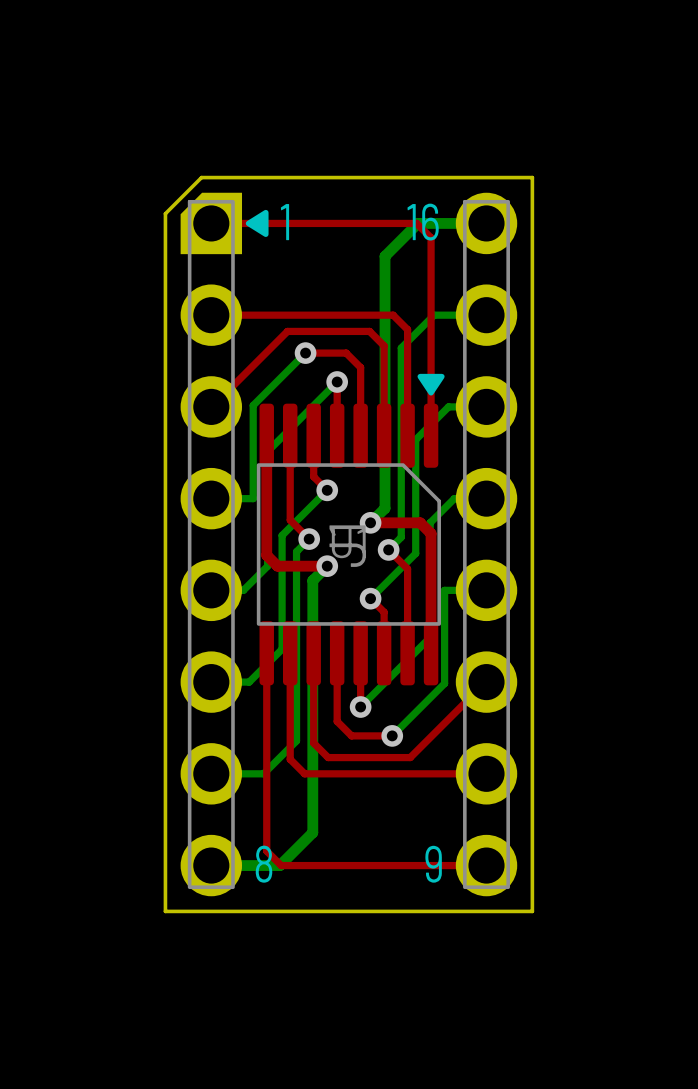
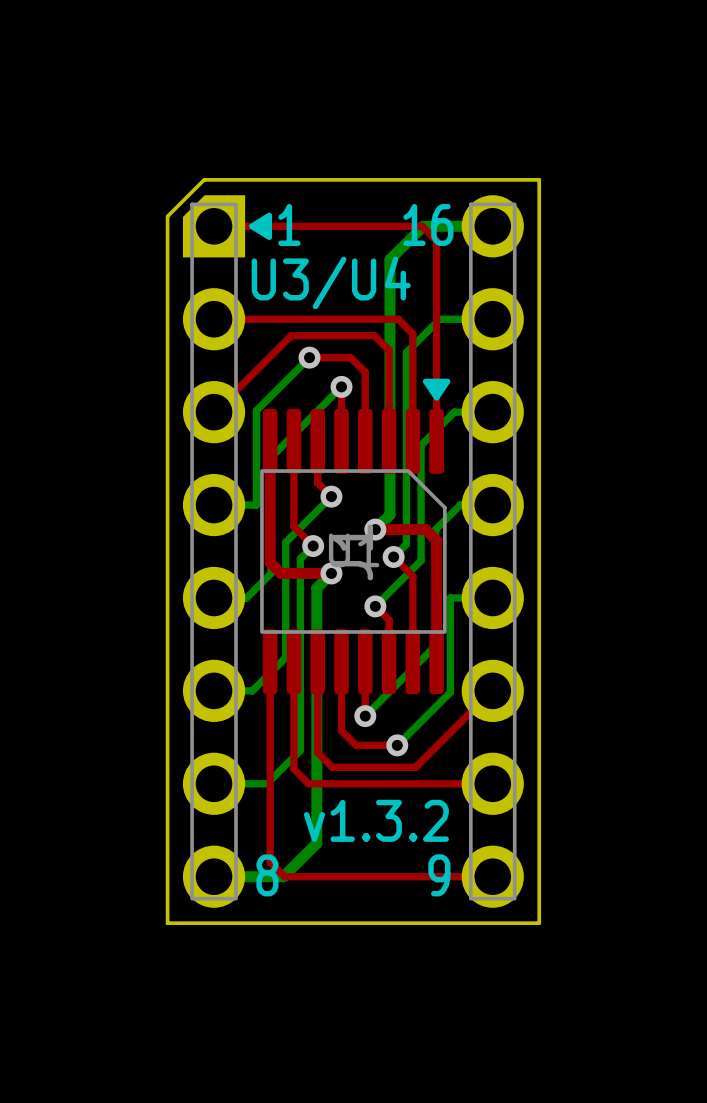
text: none -> U3/U4 (331, 282)
text: none -> v1.3.2 (376, 820)

